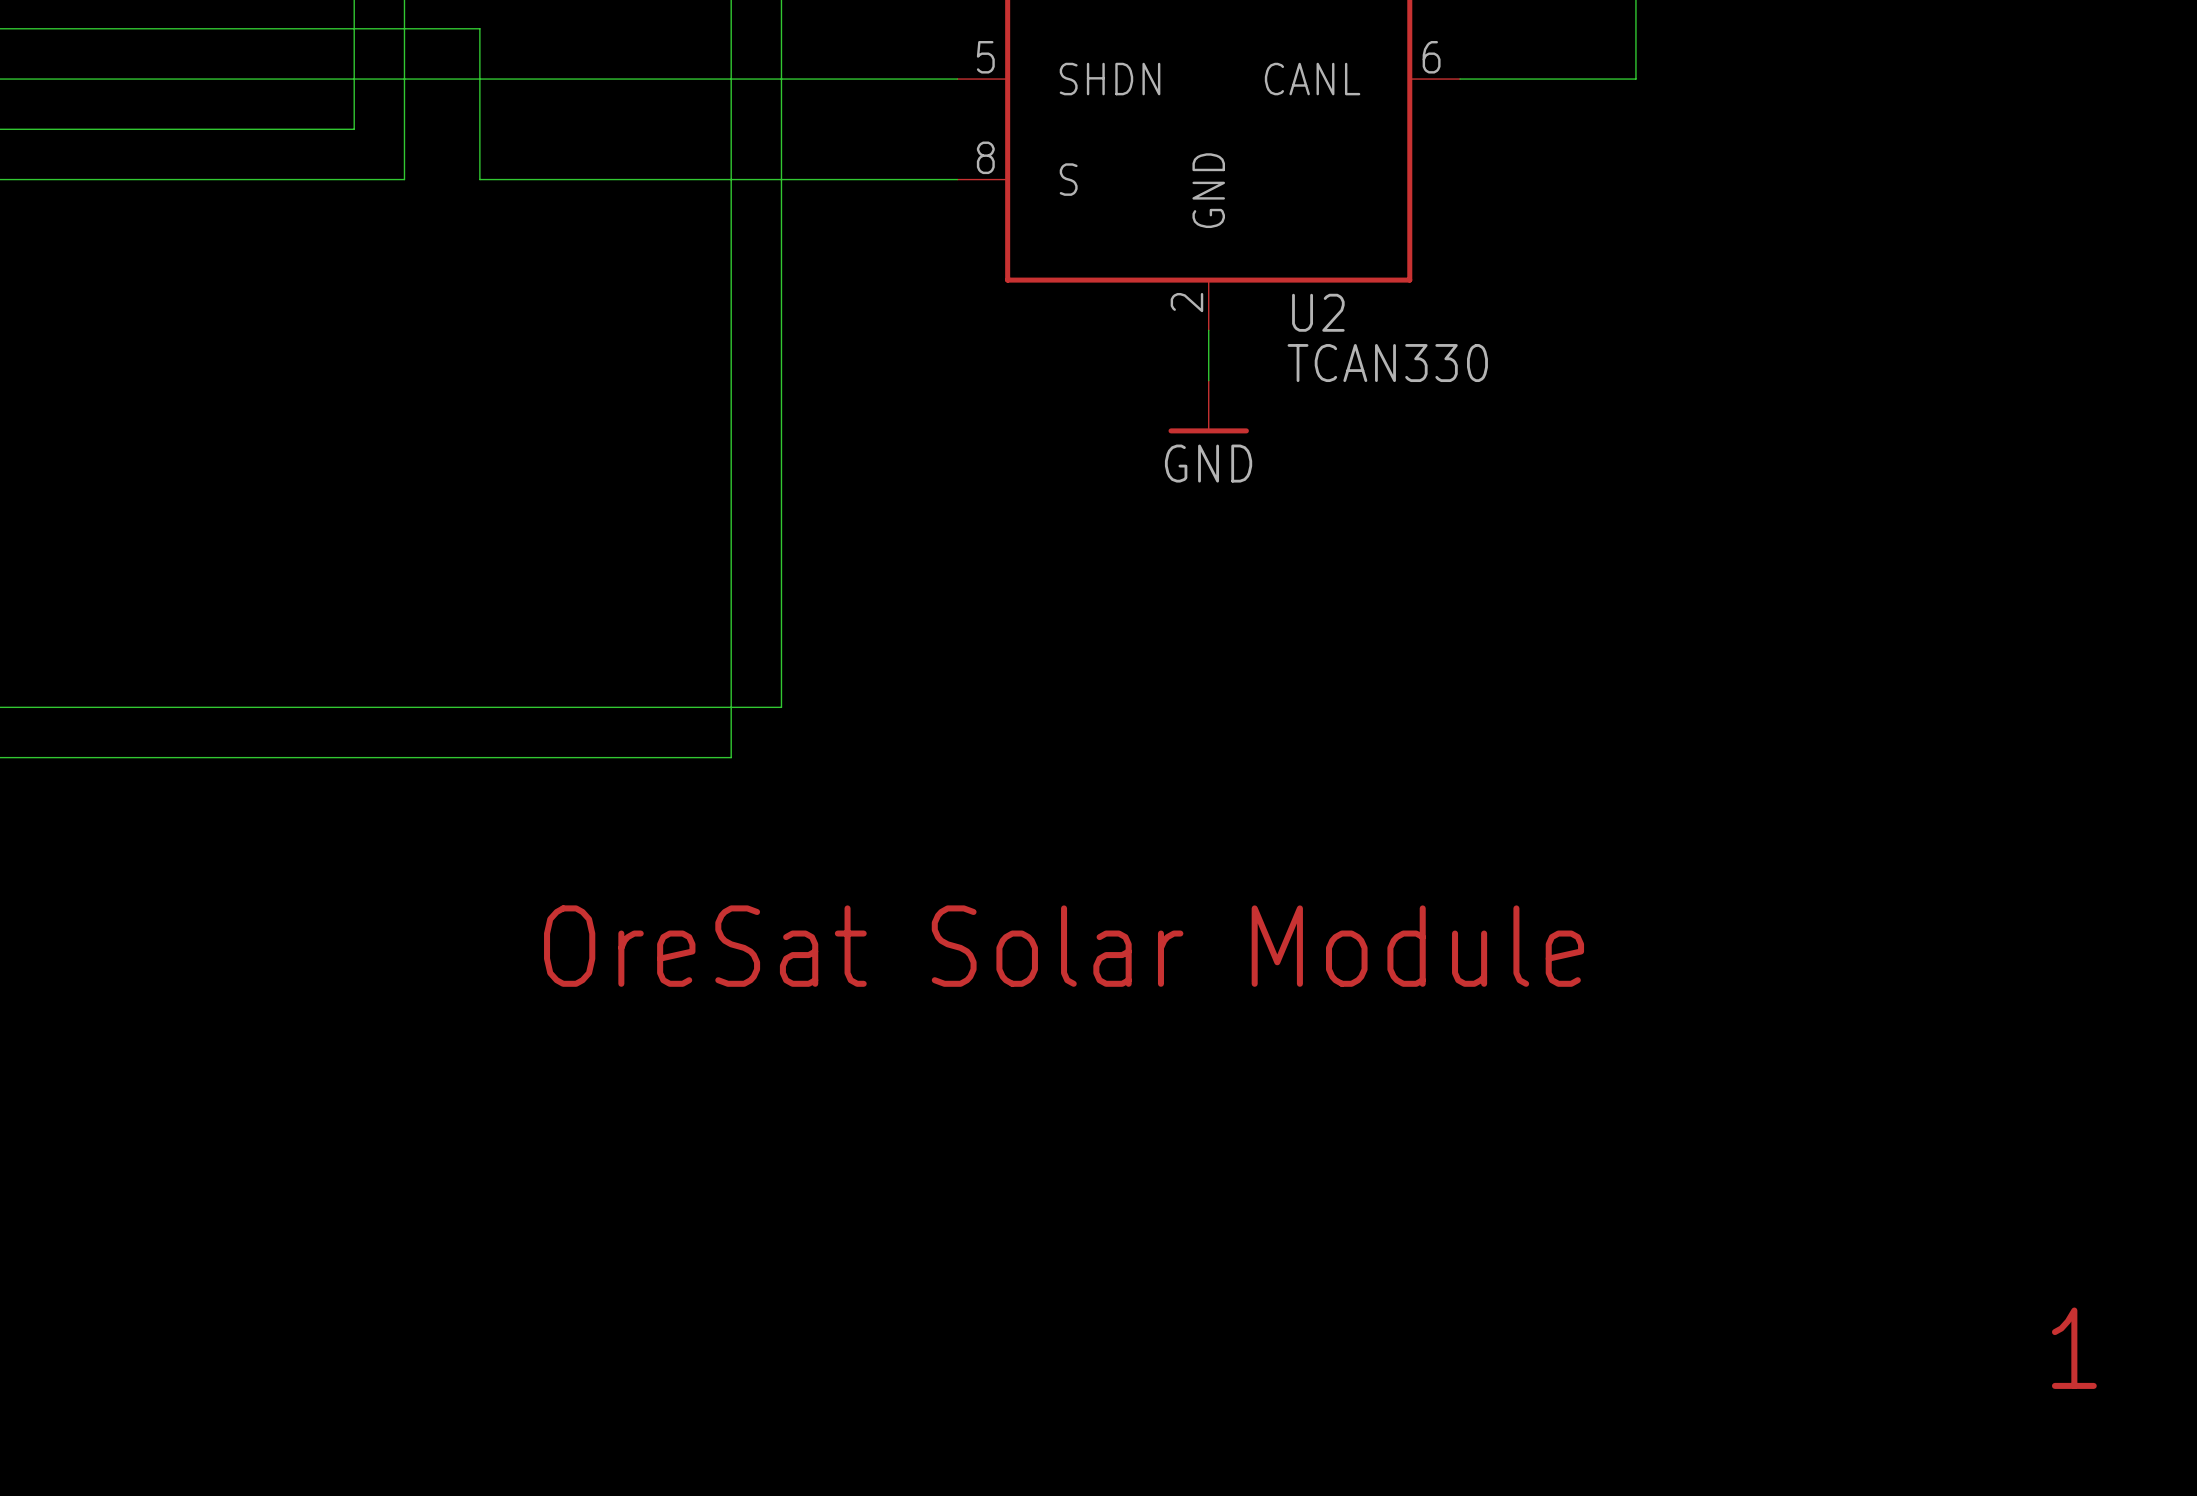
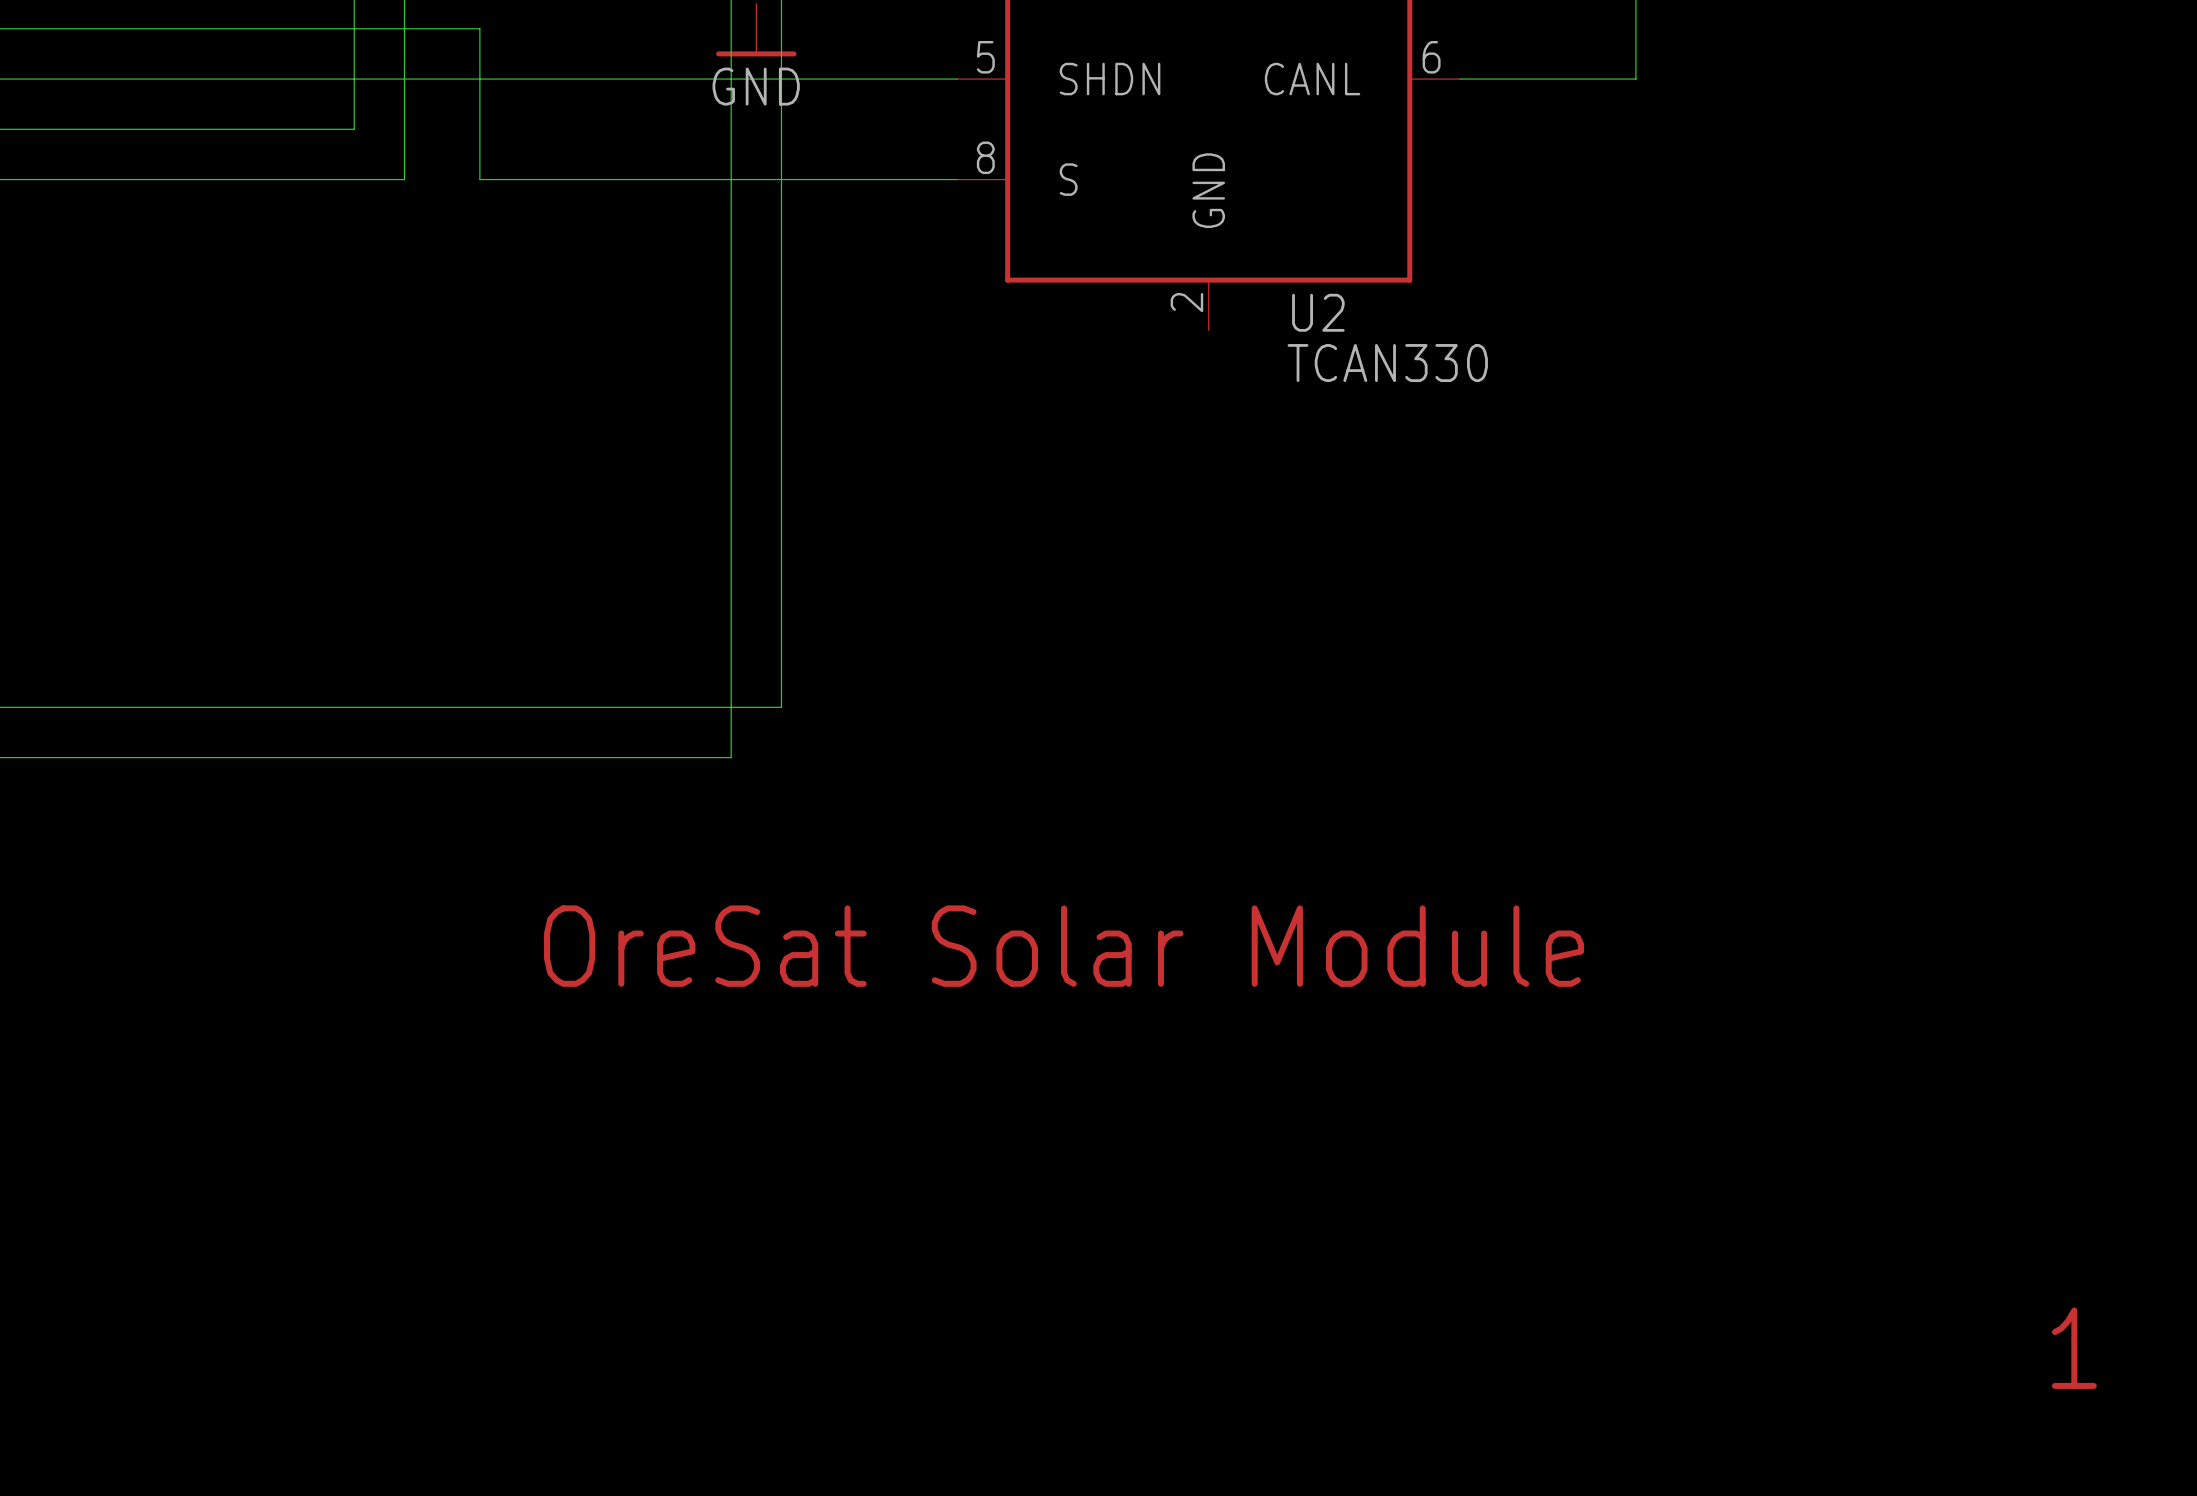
power symbol: none -> GND (756, 30)
wire: (1208, 330) (1208, 380) -> none
power symbol: GND (1208, 407) -> none

